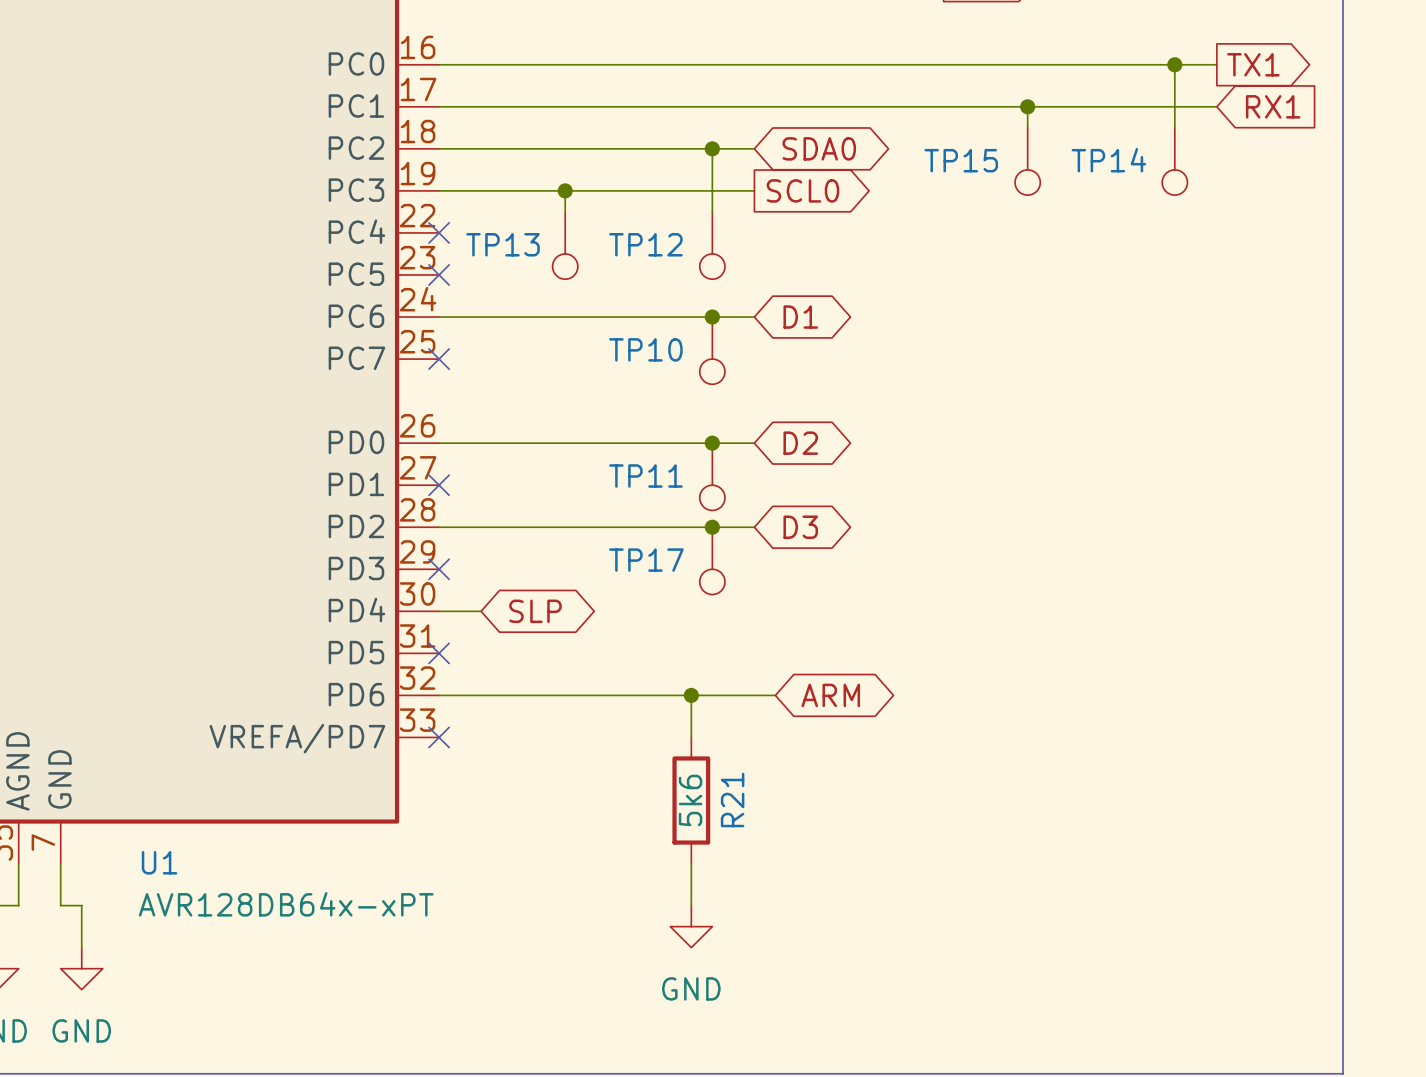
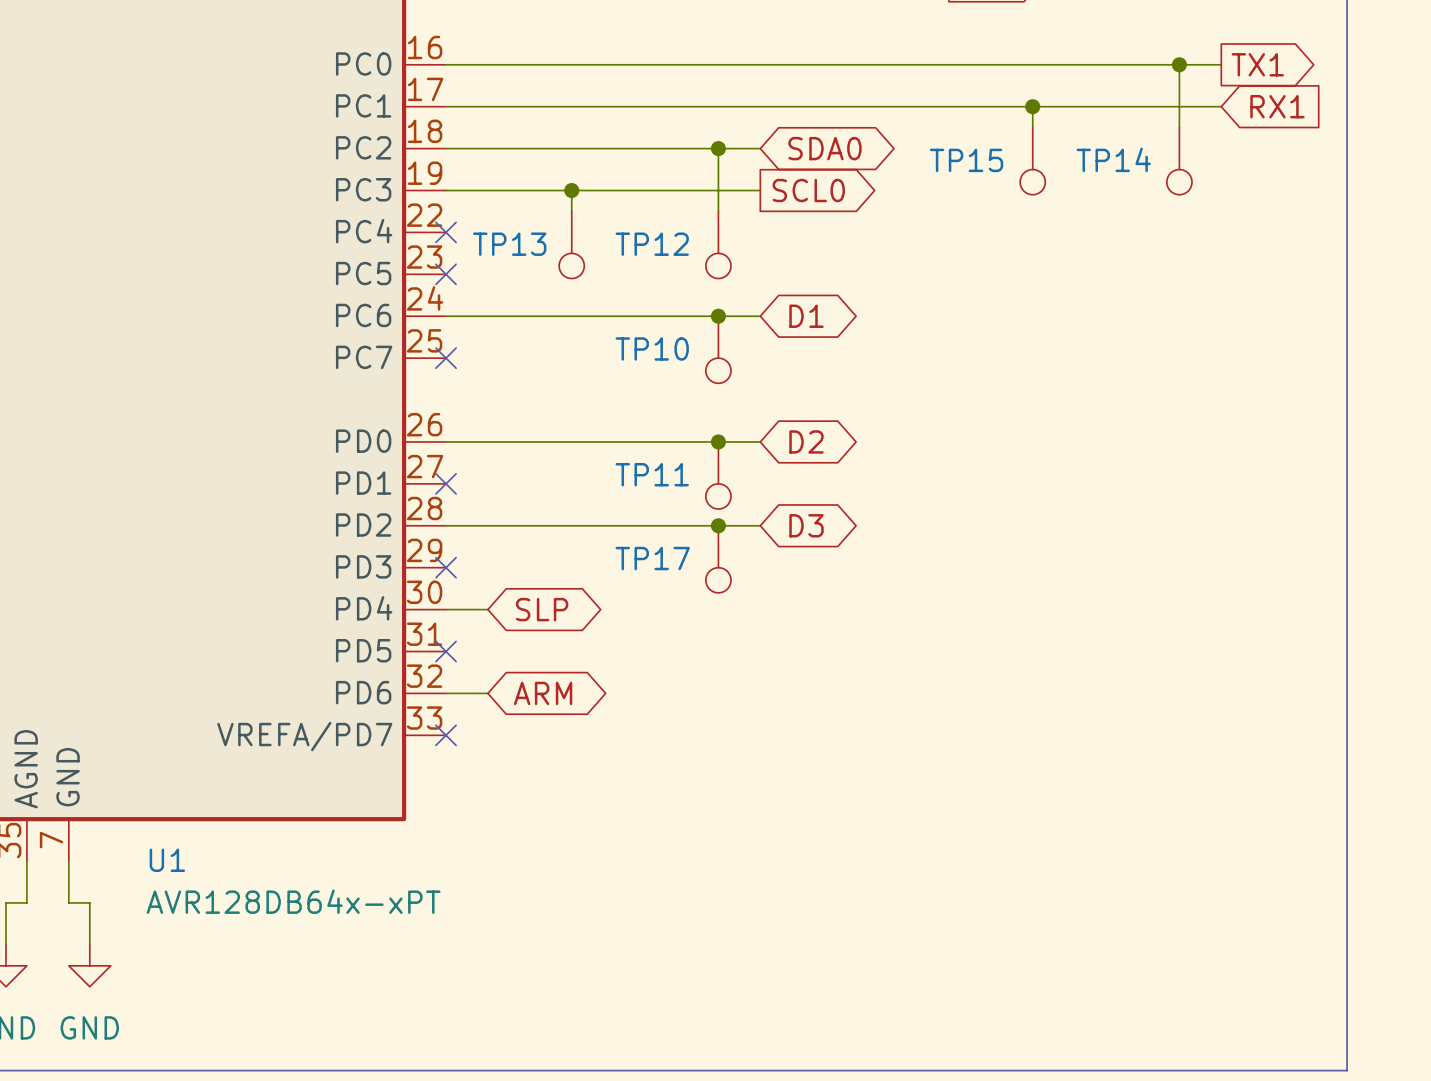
wire: (481, 695) (775, 695) -> none
wire: (691, 695) (691, 737) -> none
junction: (691, 695) -> none
global label position: ARM (830, 695) -> ARM (543, 693)
R21: 5k6 (691, 800) -> none
wire: (691, 863) (691, 905) -> none
power symbol: GND (691, 926) -> none

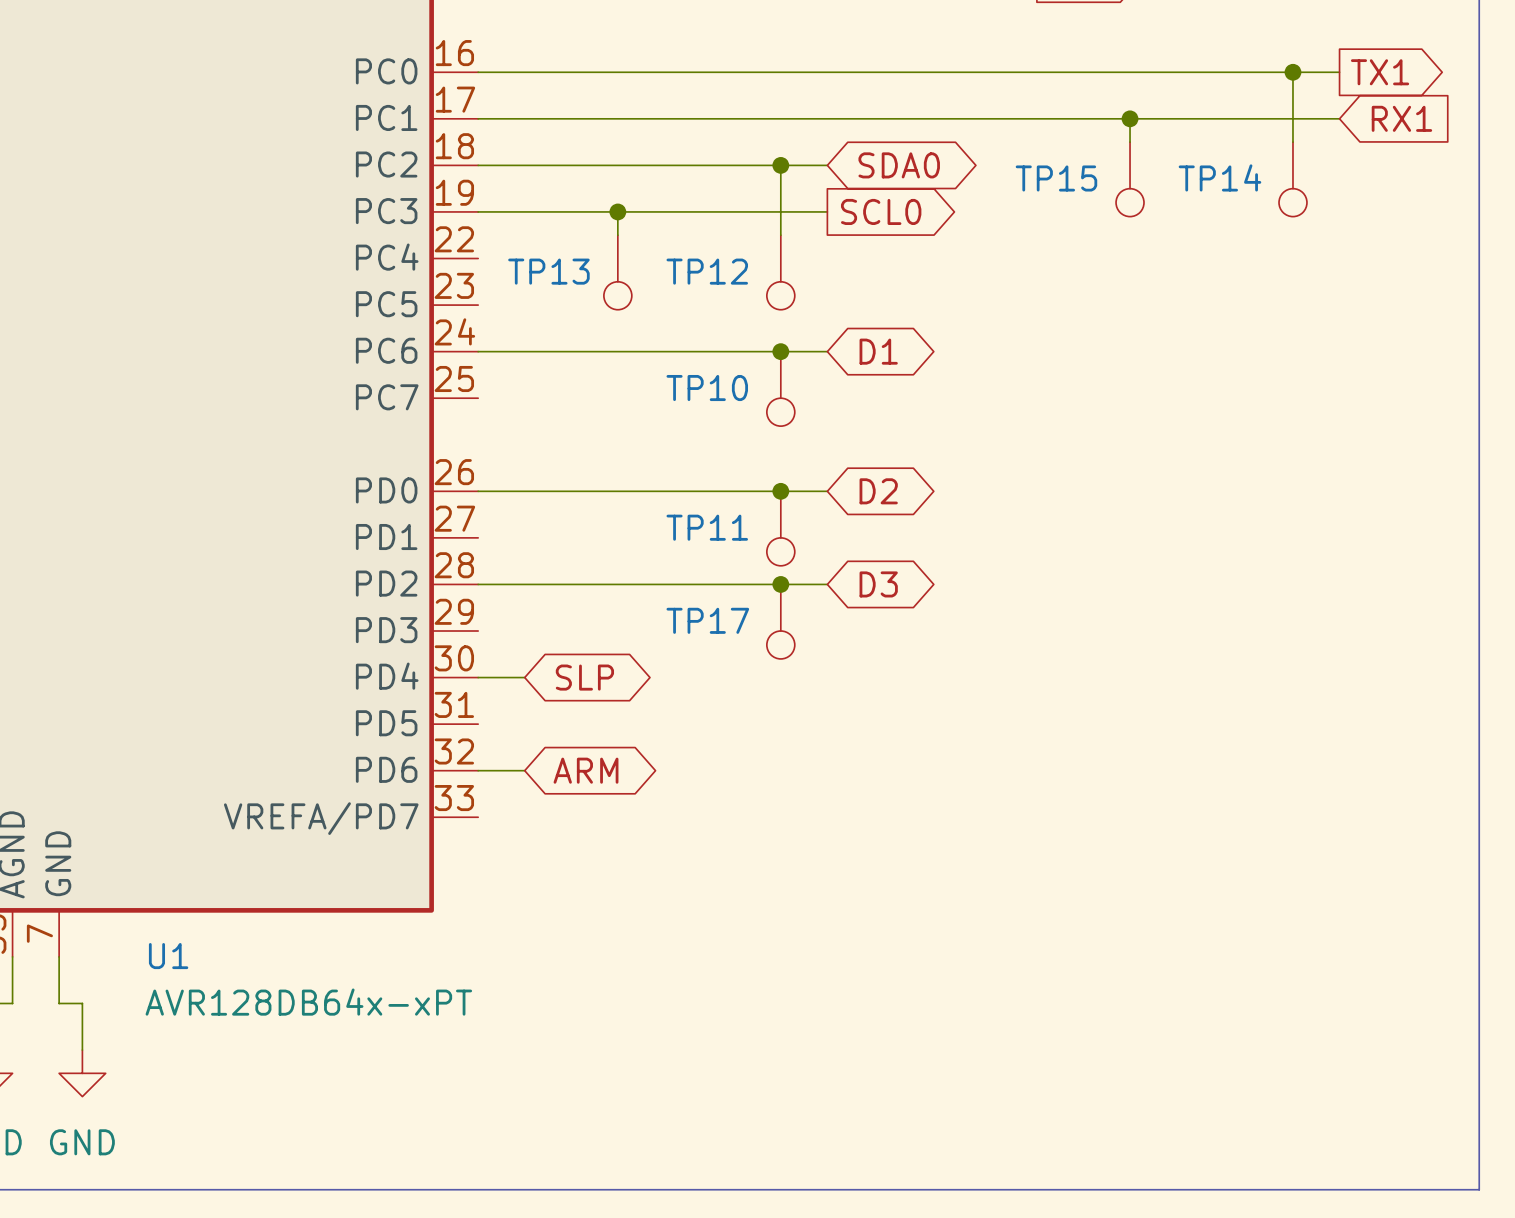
no-connect mark: (446, 232) -> none
no-connect mark: (446, 274) -> none
no-connect mark: (446, 358) -> none
no-connect mark: (446, 483) -> none
no-connect mark: (446, 567) -> none
no-connect mark: (446, 651) -> none
no-connect mark: (446, 735) -> none

